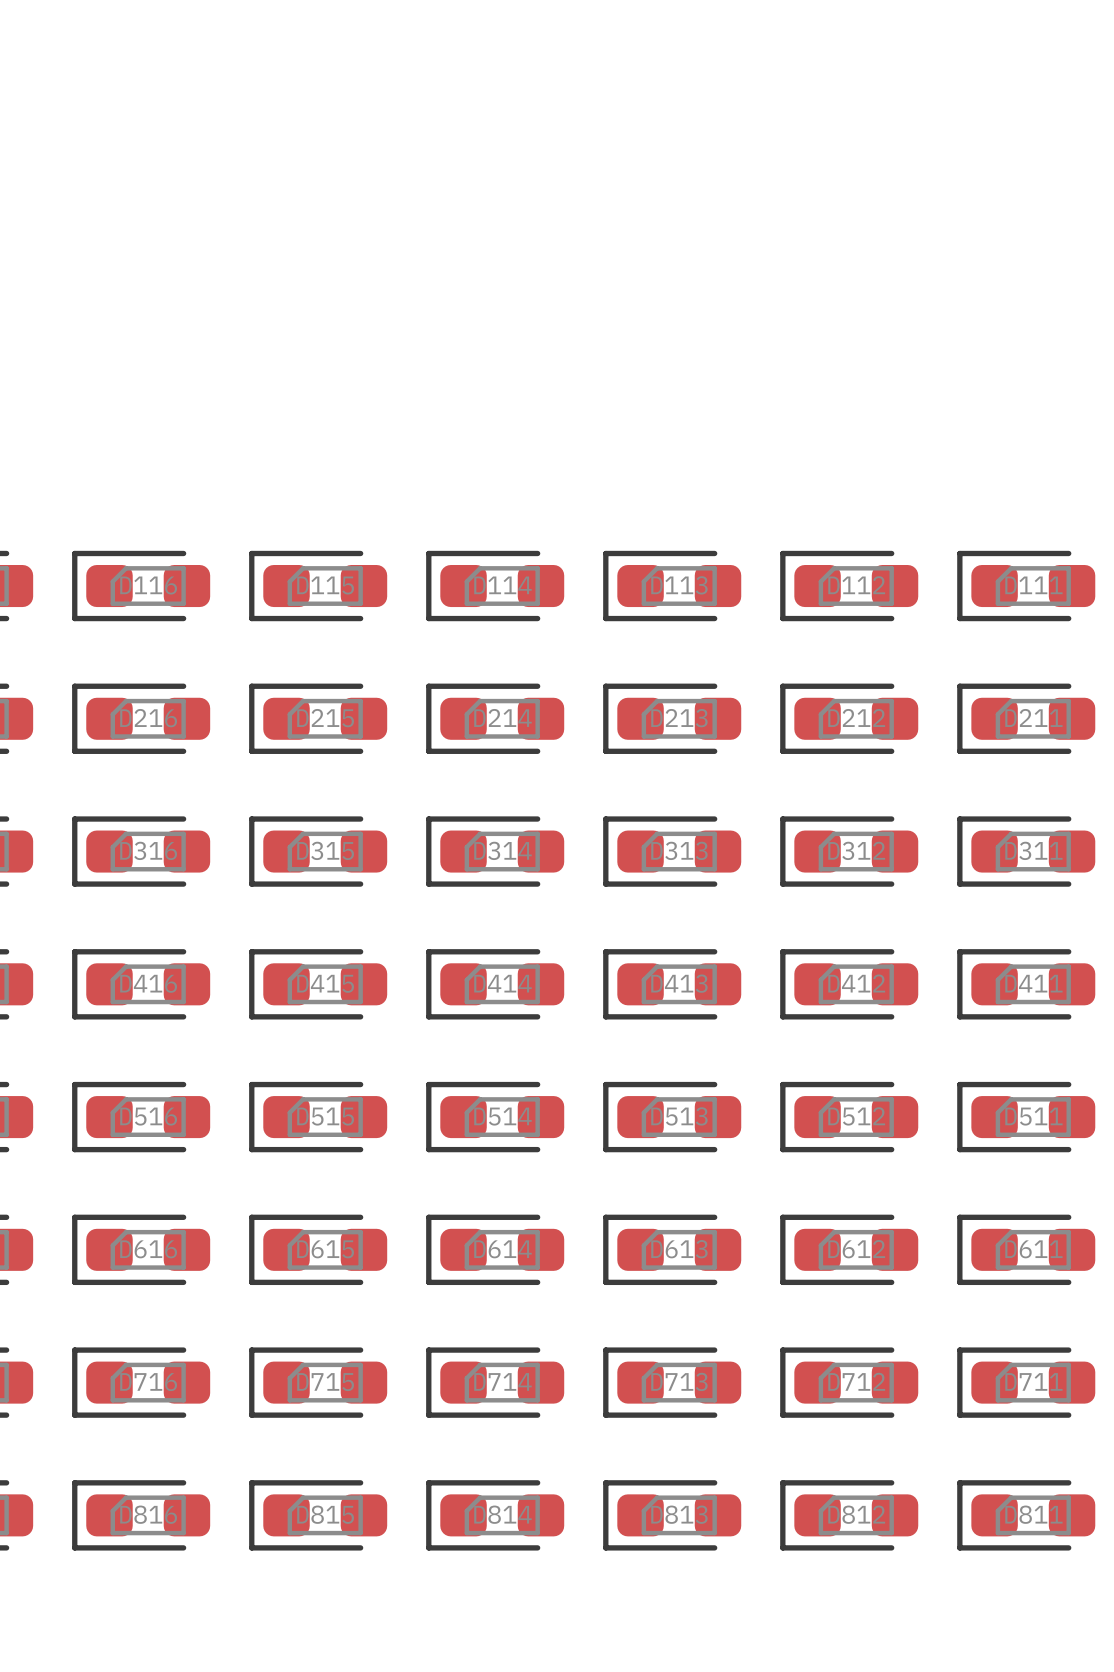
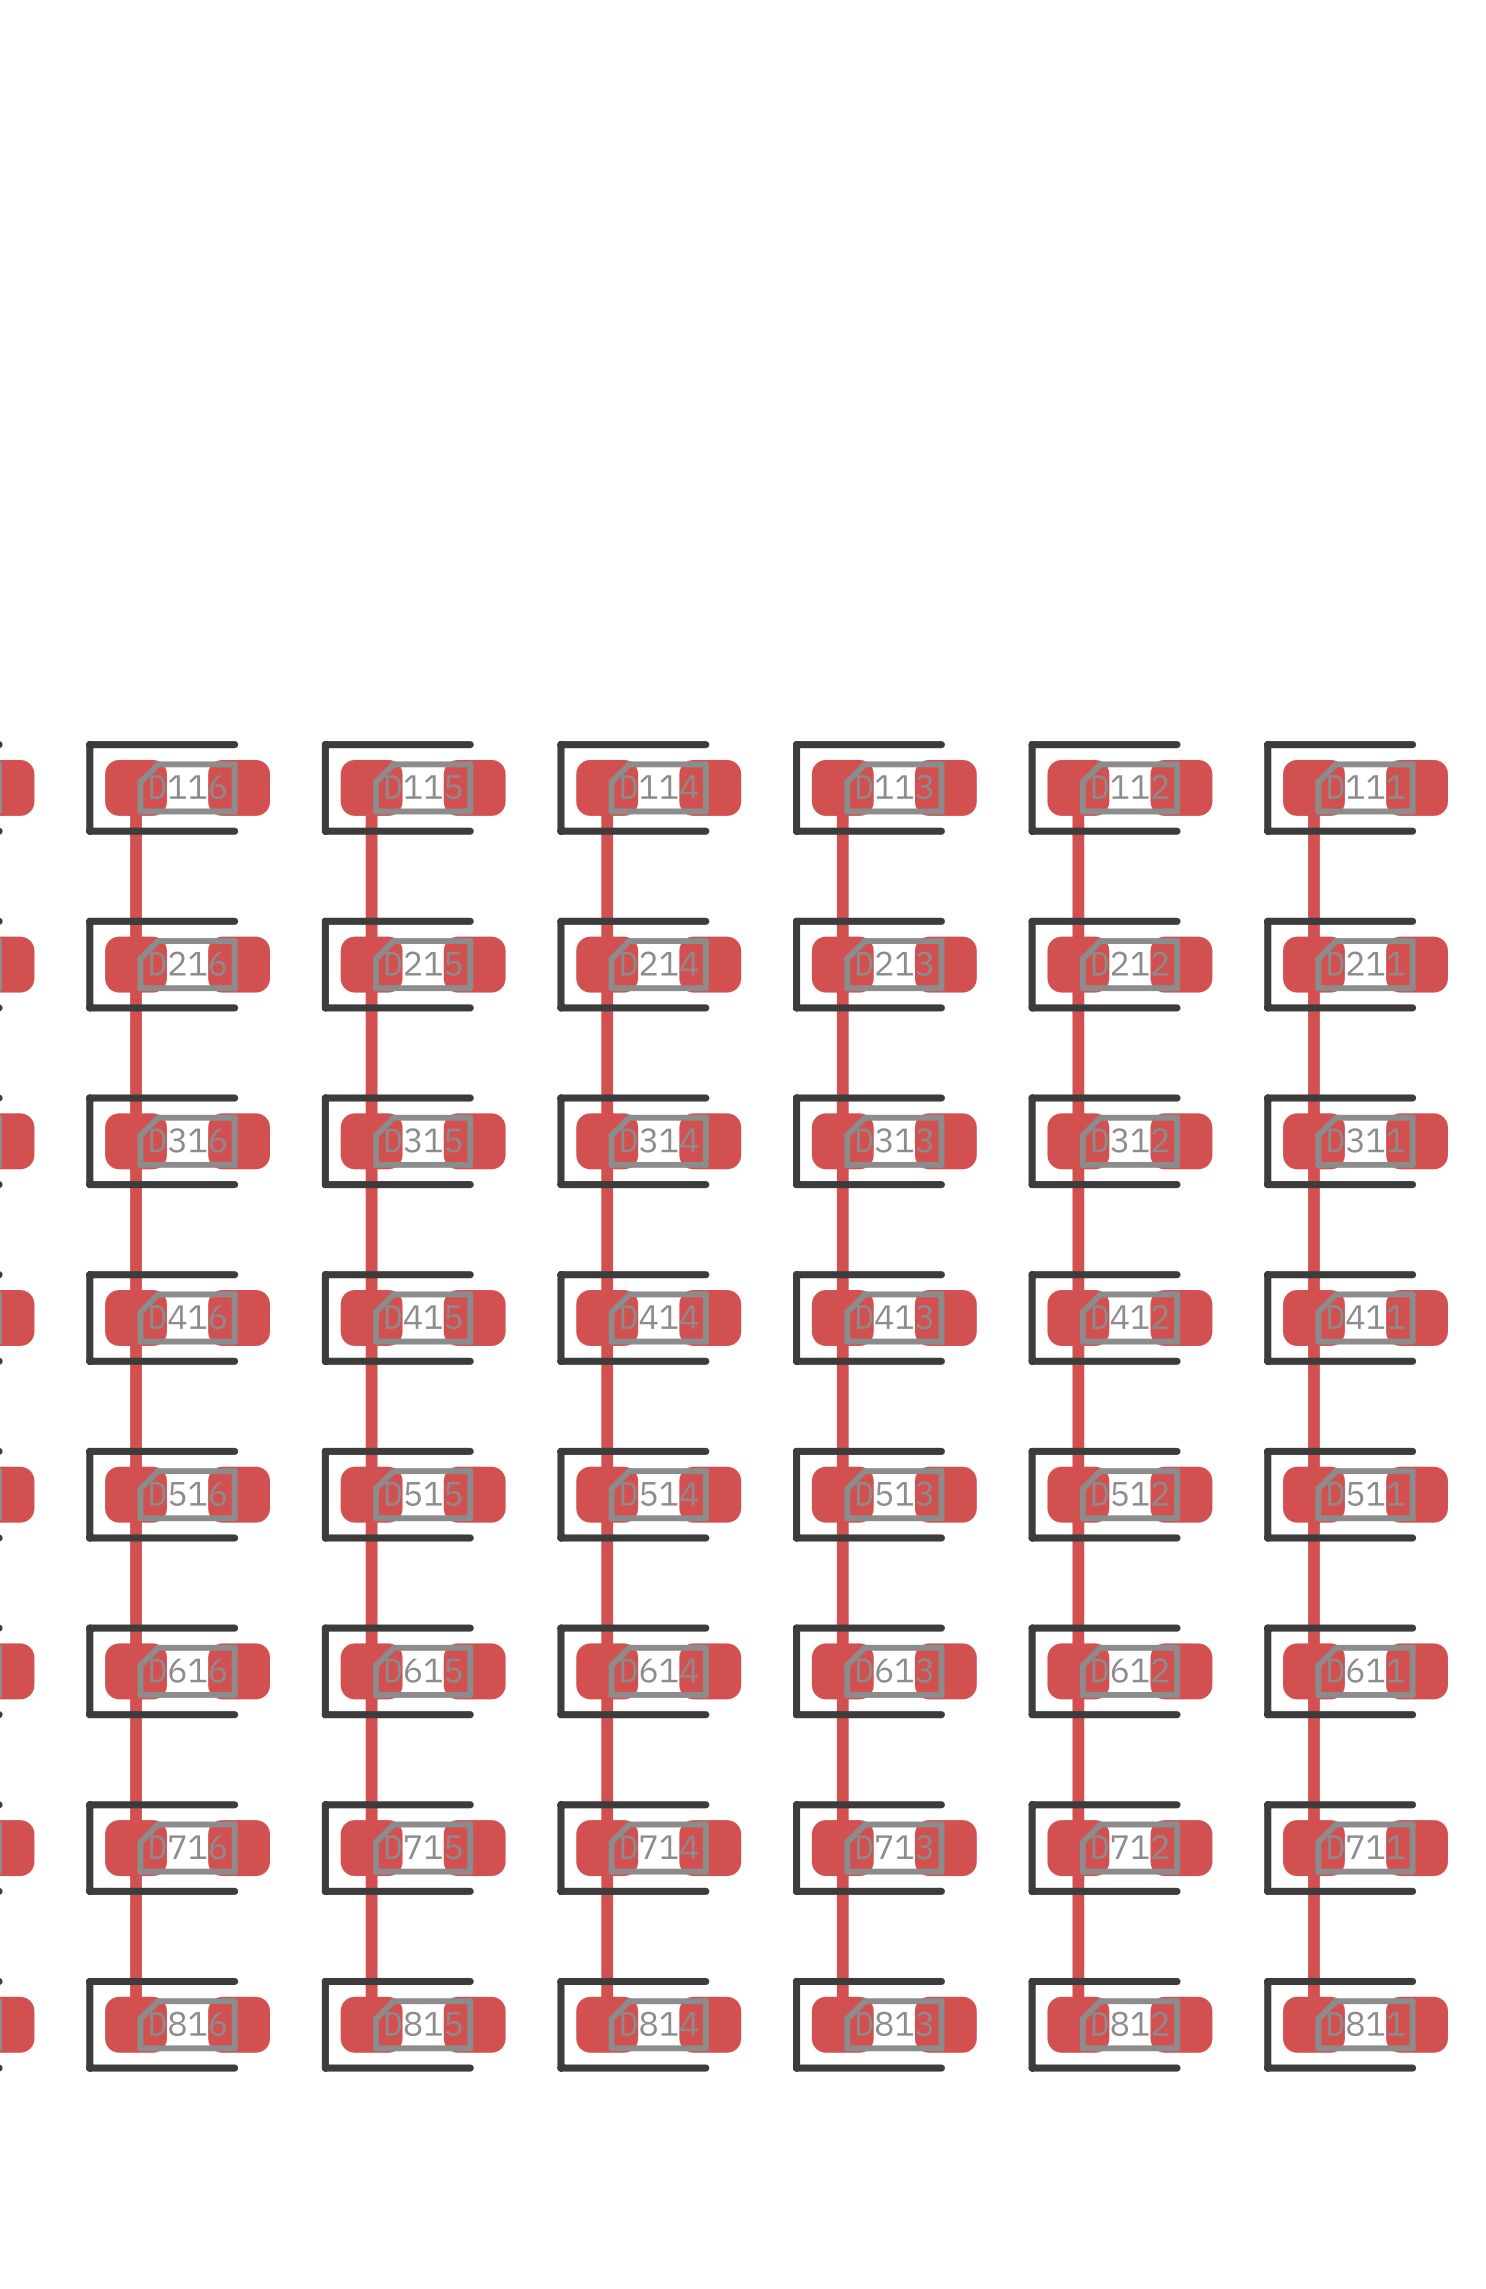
track: none -> (136, 787) (136, 2024)
track: none -> (371, 787) (371, 2024)
track: none -> (607, 787) (607, 2024)
track: none -> (842, 787) (842, 2024)
track: none -> (1078, 787) (1078, 2024)
track: none -> (1313, 787) (1313, 2024)

